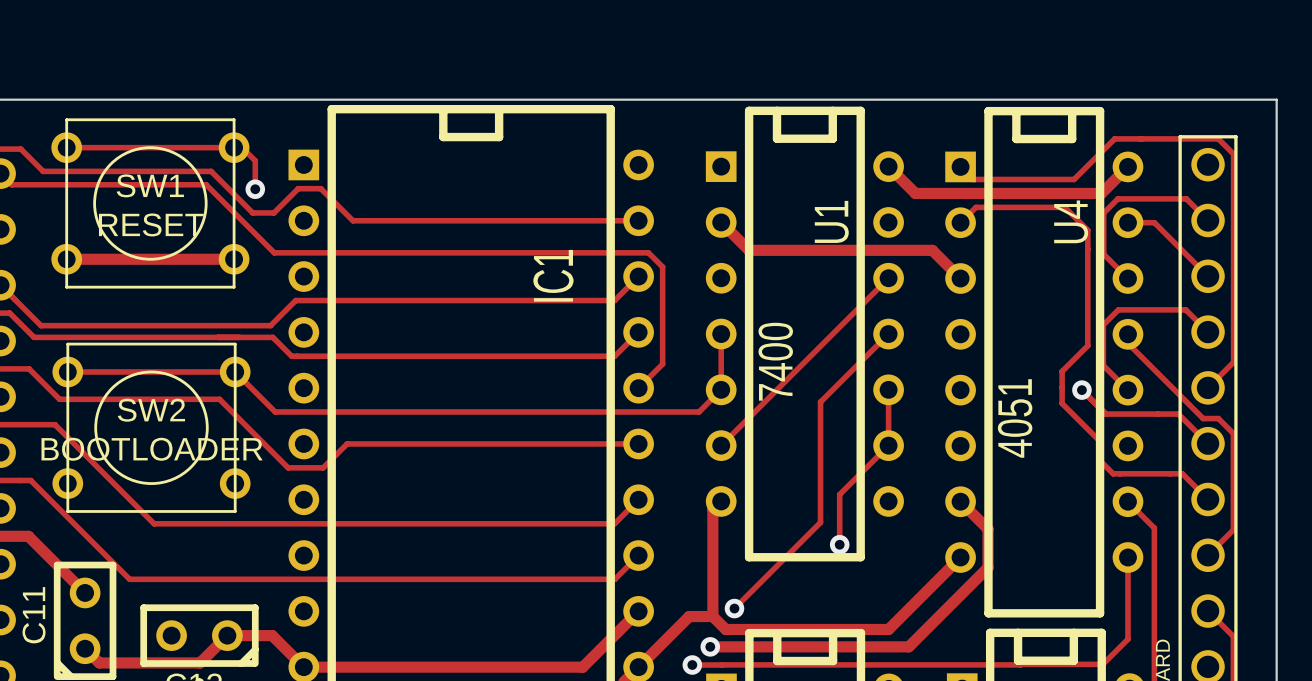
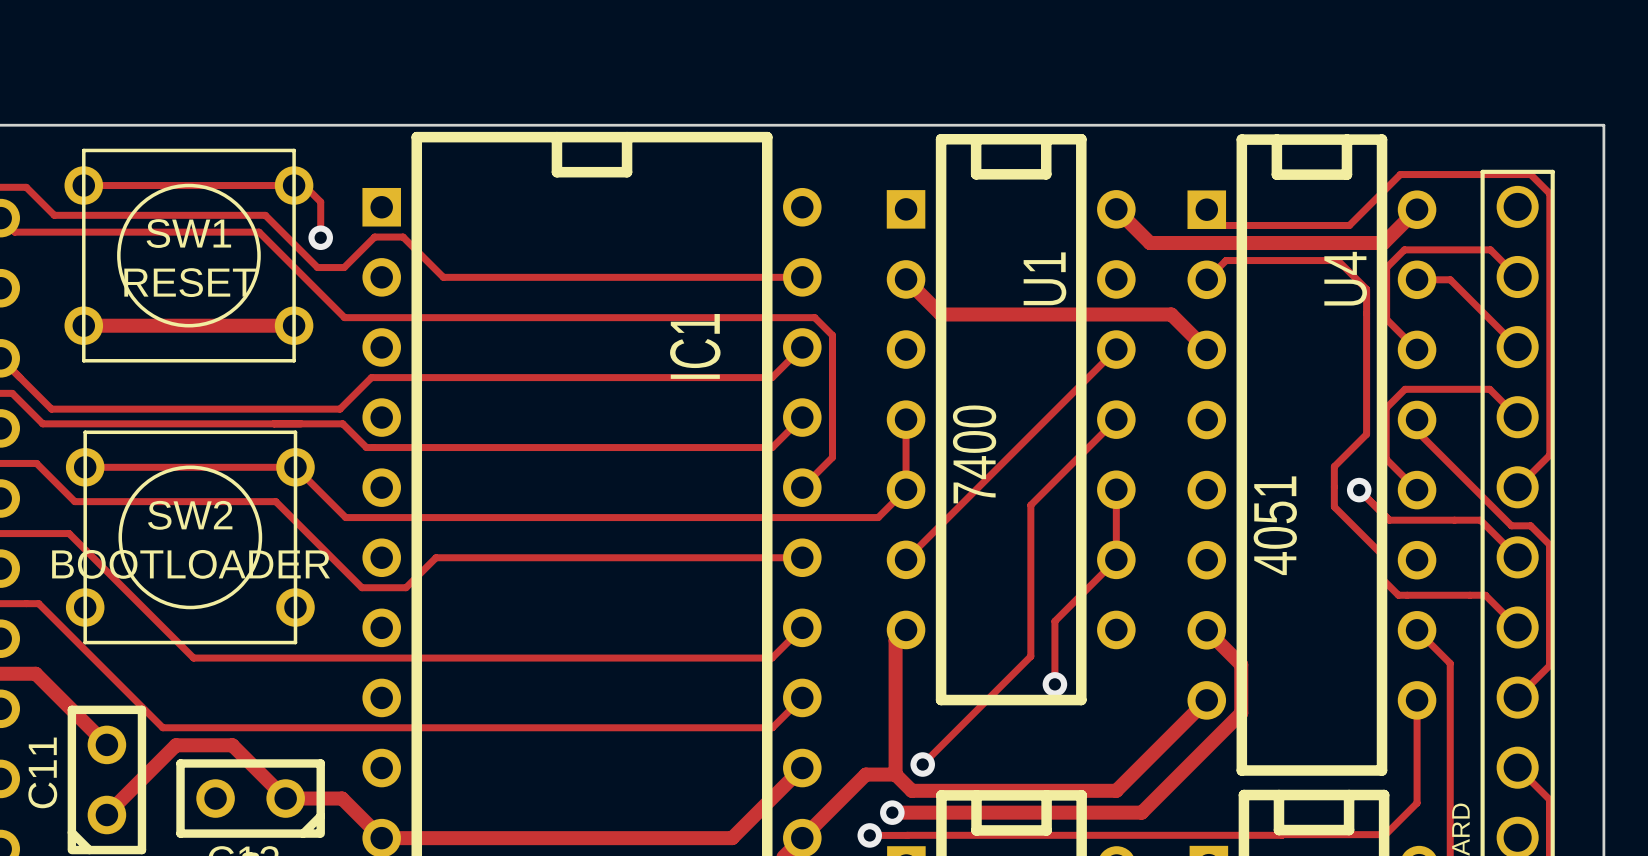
track: (227, 635) (200, 662) (99, 662) (85, 648) -> (285, 798) (232, 745) (175, 745) (106, 815)

